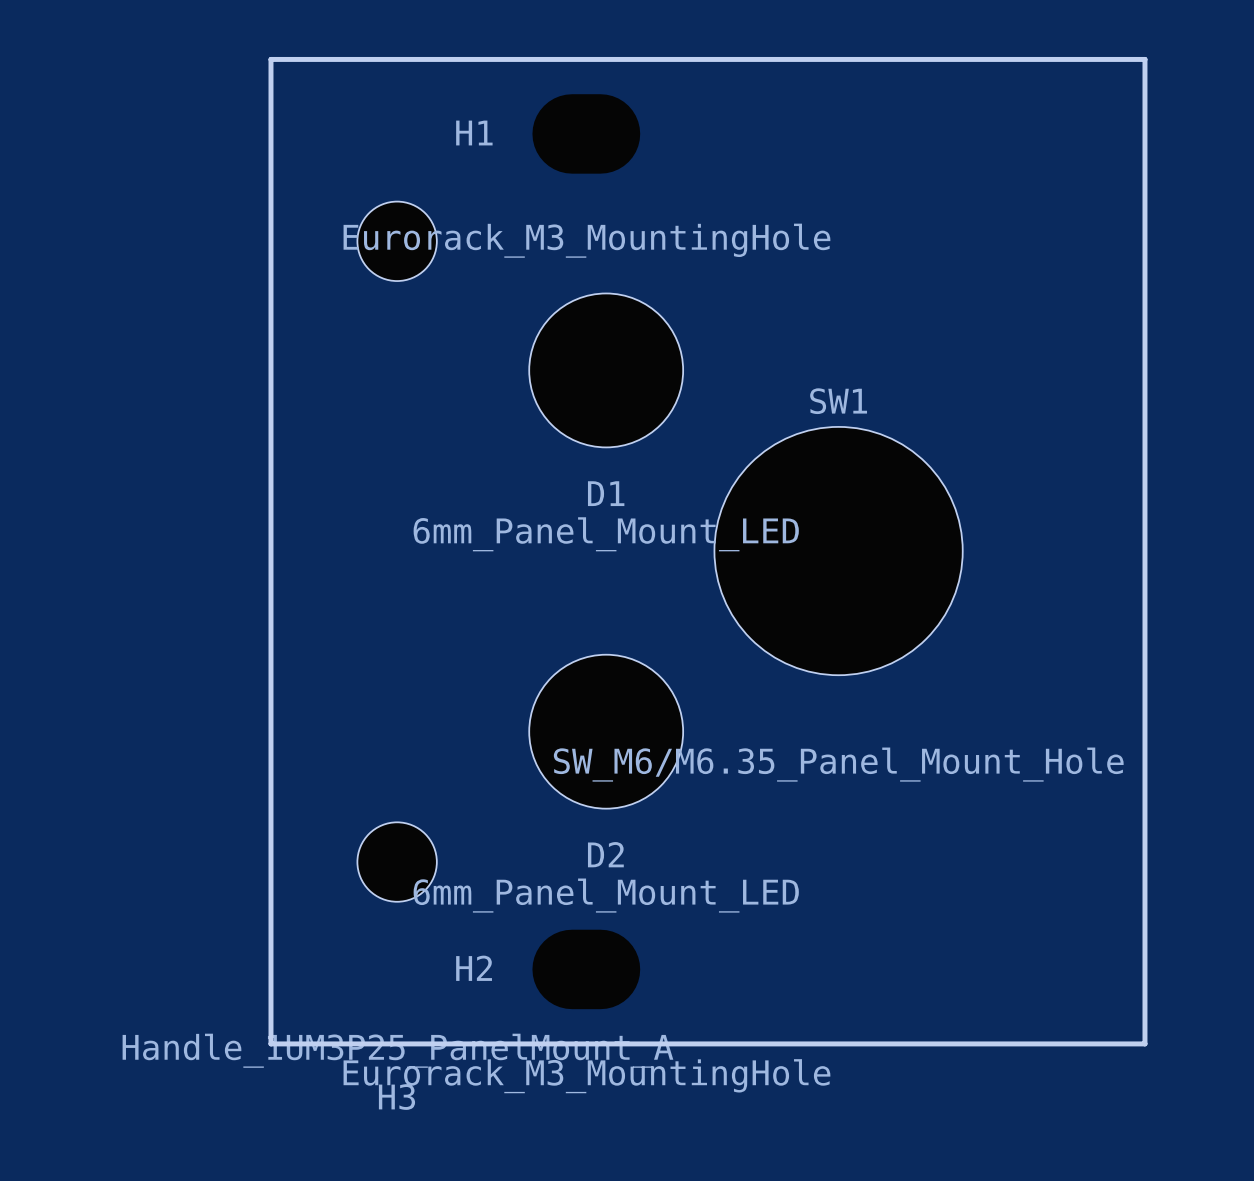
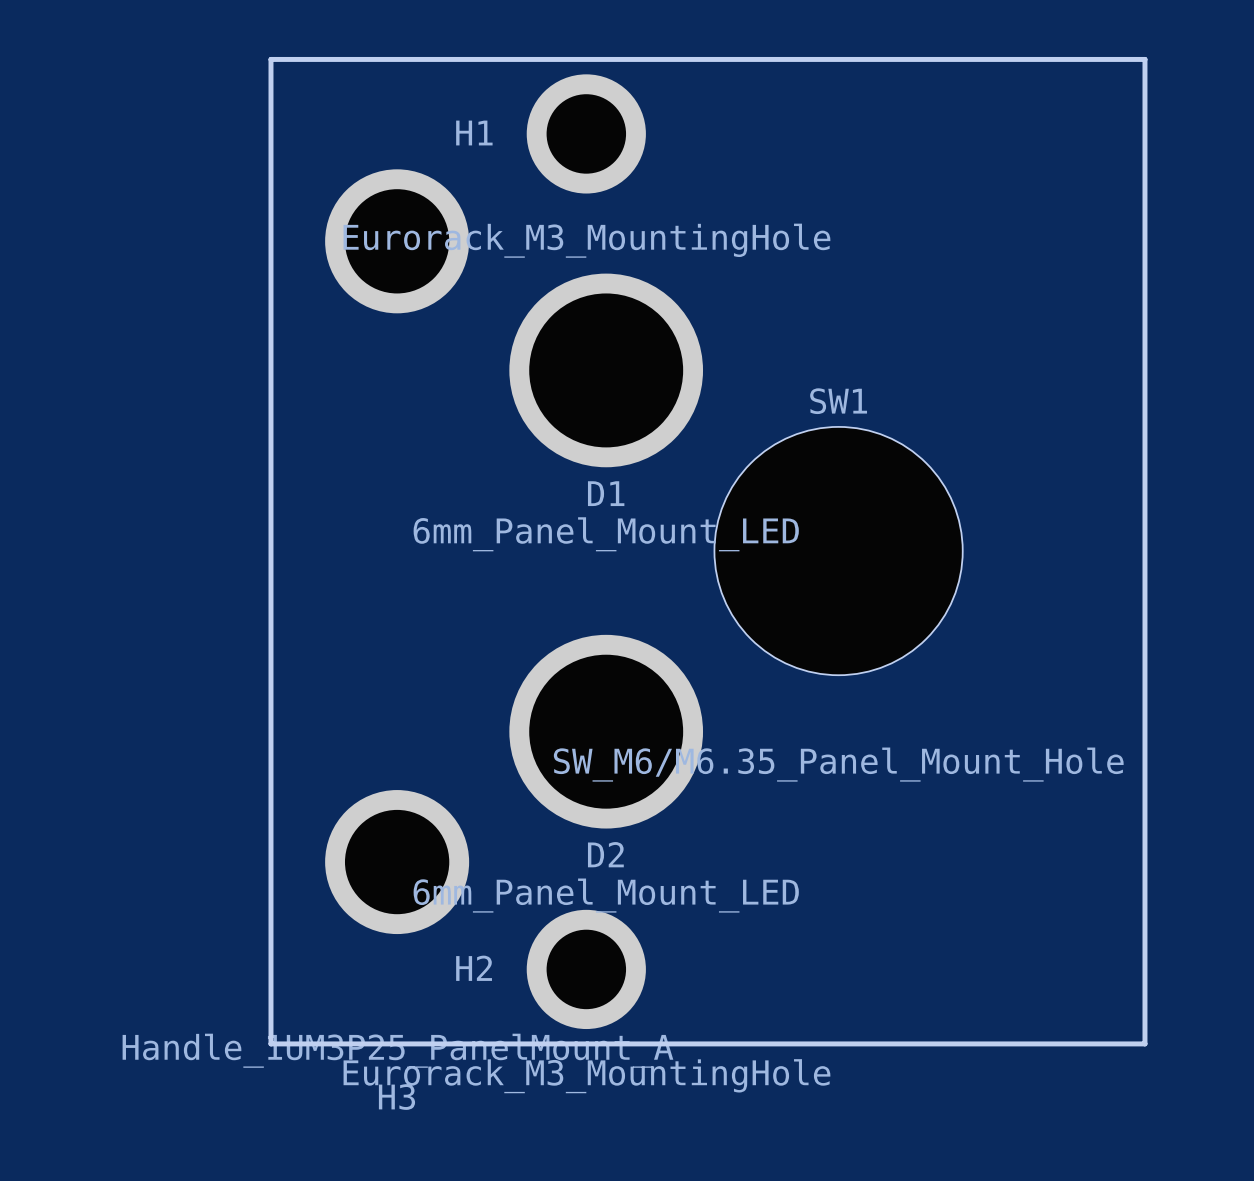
H1 footprint: [532, 94, 641, 174] -> [526, 74, 646, 194]
H3 footprint: [357, 201, 437, 902] -> [325, 169, 470, 935]
D1 footprint: [529, 293, 684, 448] -> [509, 273, 704, 468]
D2 footprint: [529, 654, 684, 809] -> [509, 634, 704, 829]
H2 footprint: [532, 929, 641, 1010] -> [526, 909, 646, 1030]

